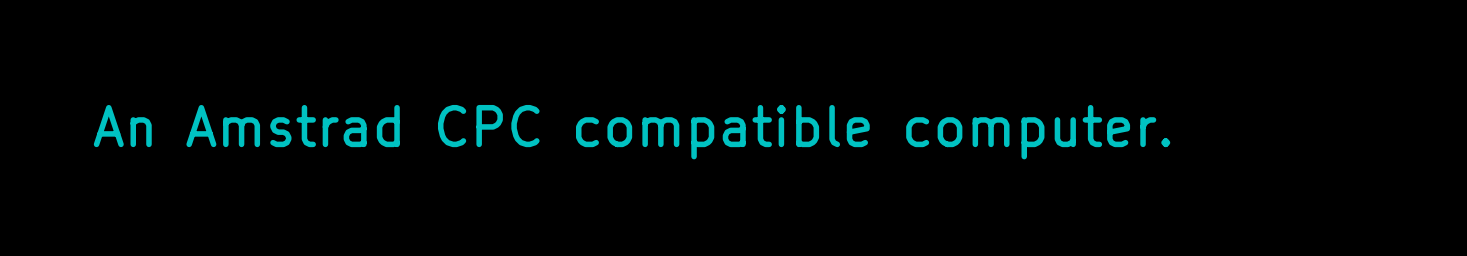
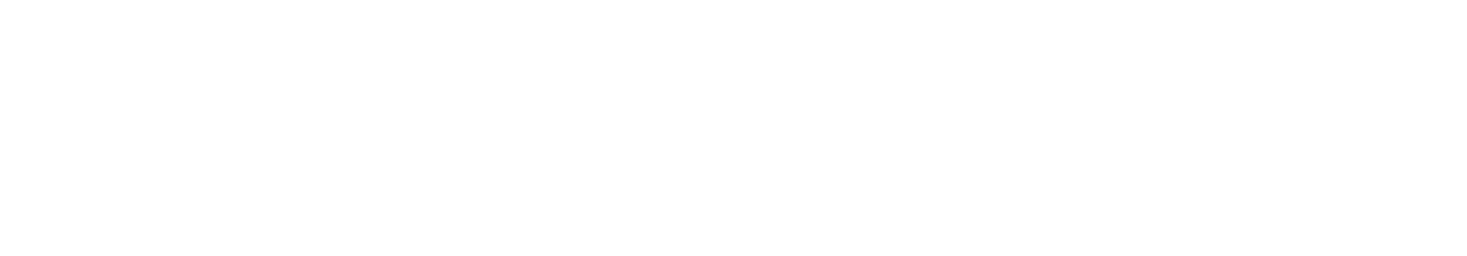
text: An Amstrad CPC compatible computer. (632, 132) -> none

